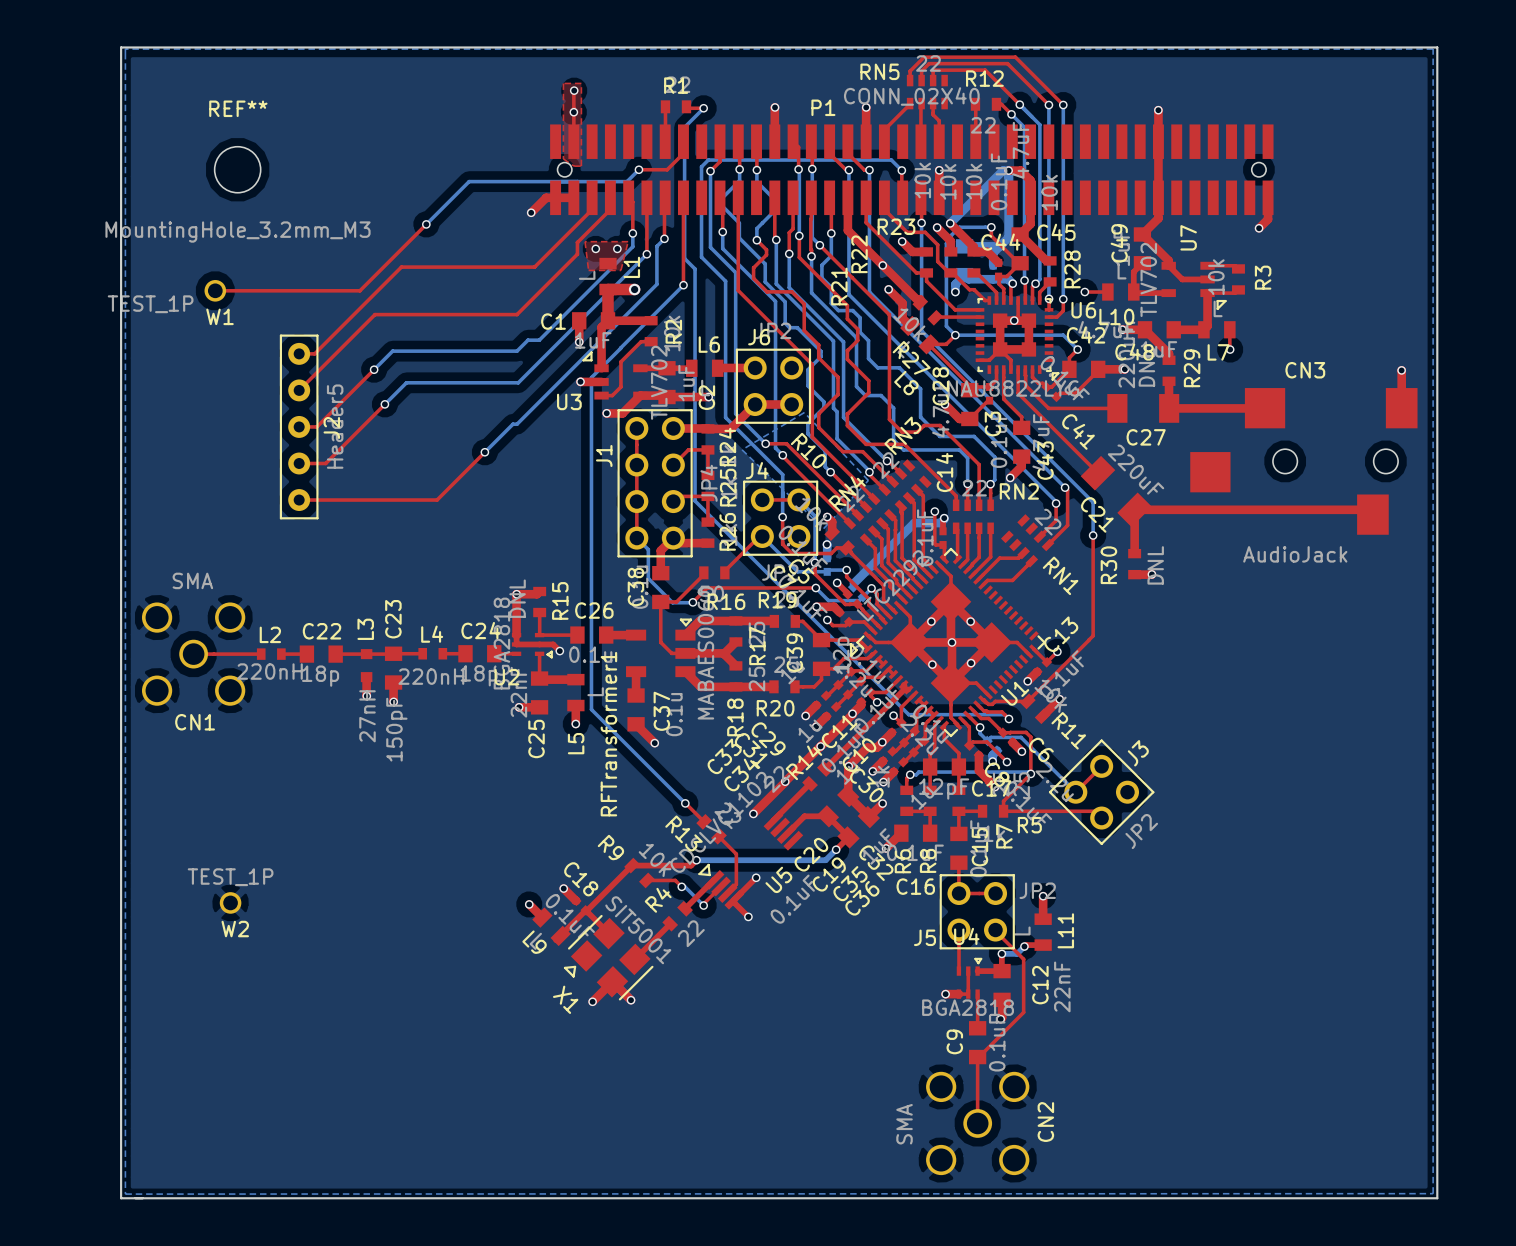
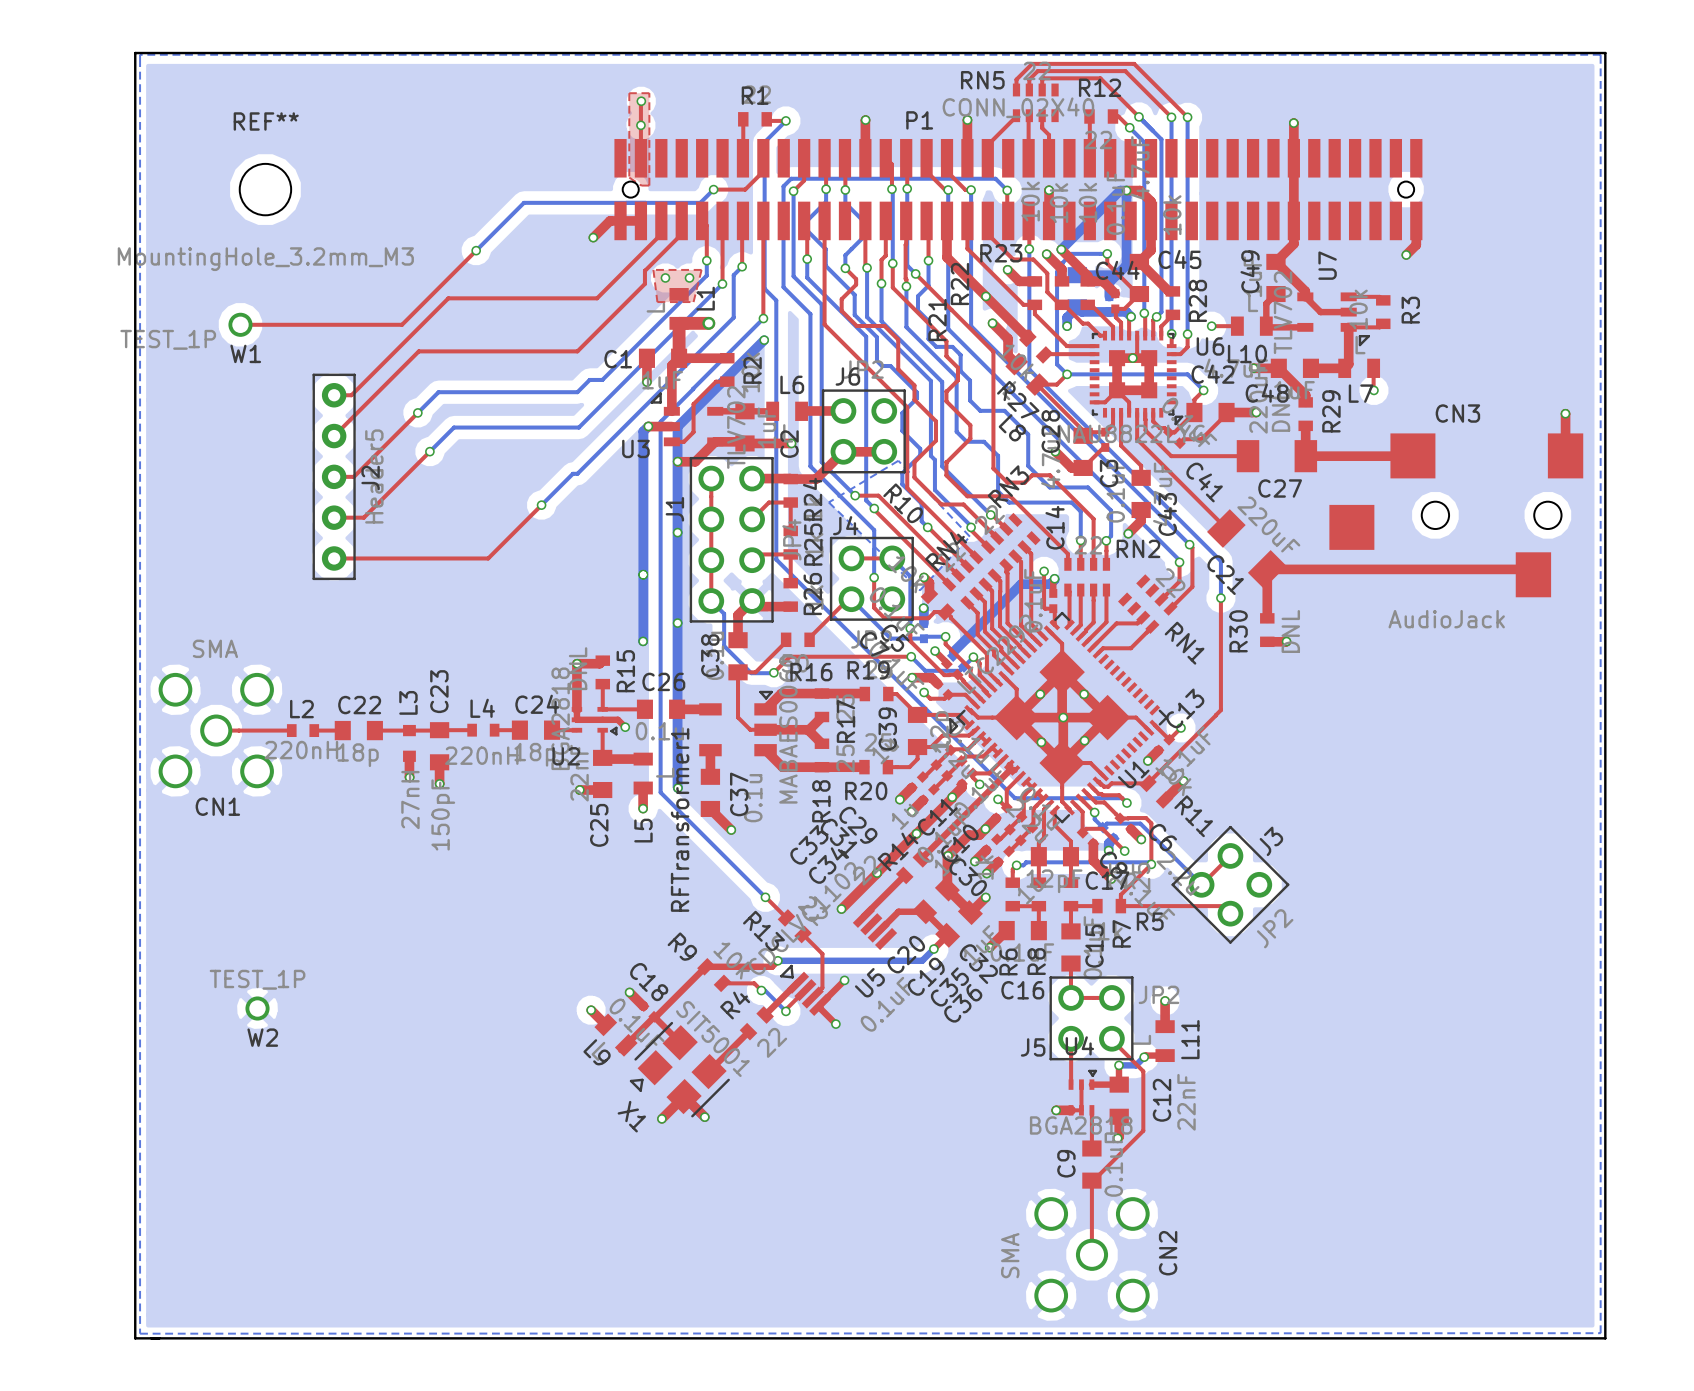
bottom track: none -> (764, 340) (677, 426) (677, 788)
via: none -> (764, 340)
bottom track: none -> (648, 426) (643, 431) (643, 641)
via: none -> (677, 532)
via: none -> (643, 574)
via: none -> (677, 623)
via: none -> (643, 641)
via: none -> (677, 788)

